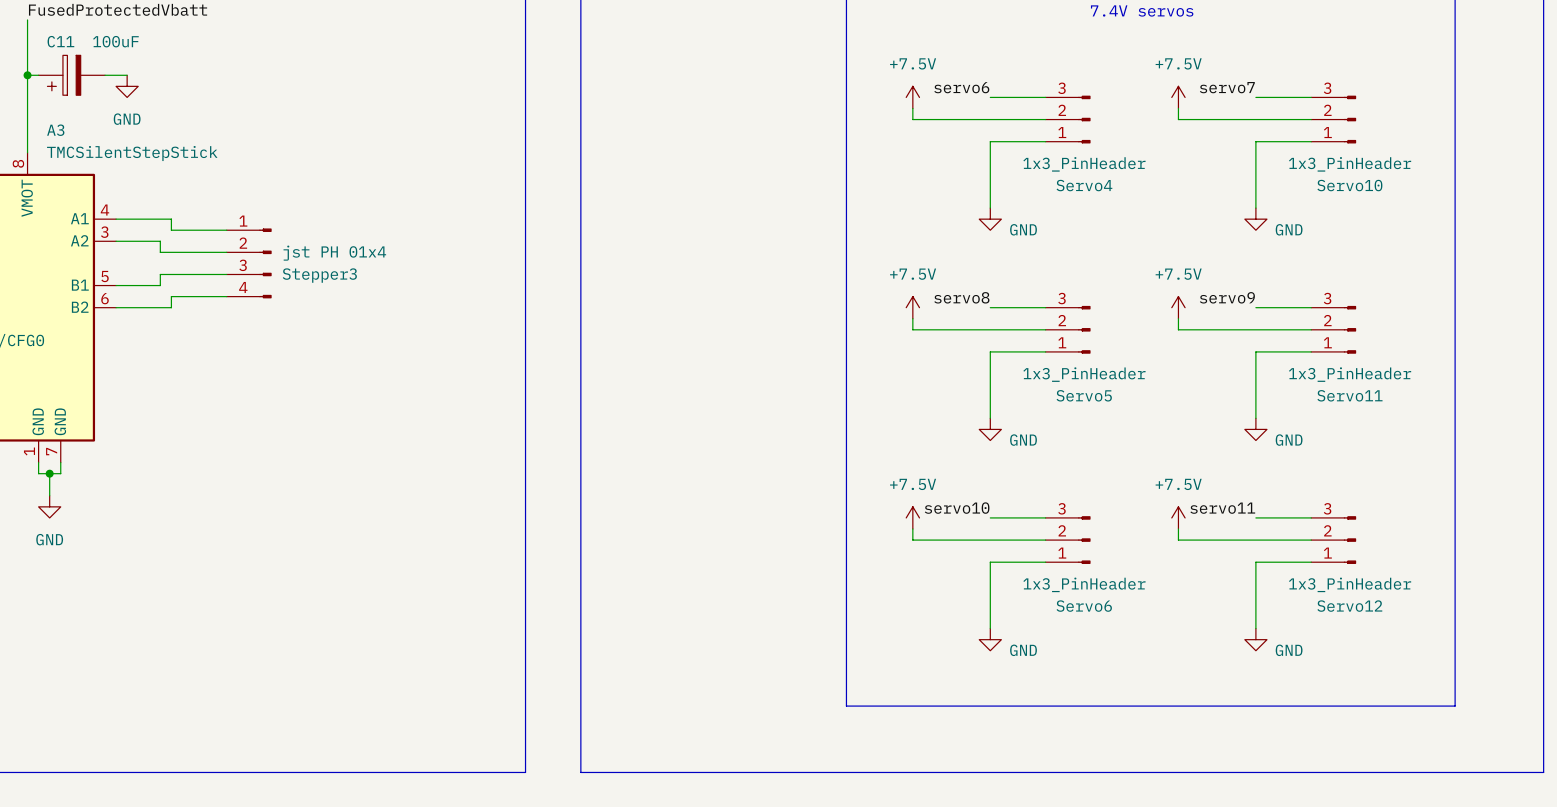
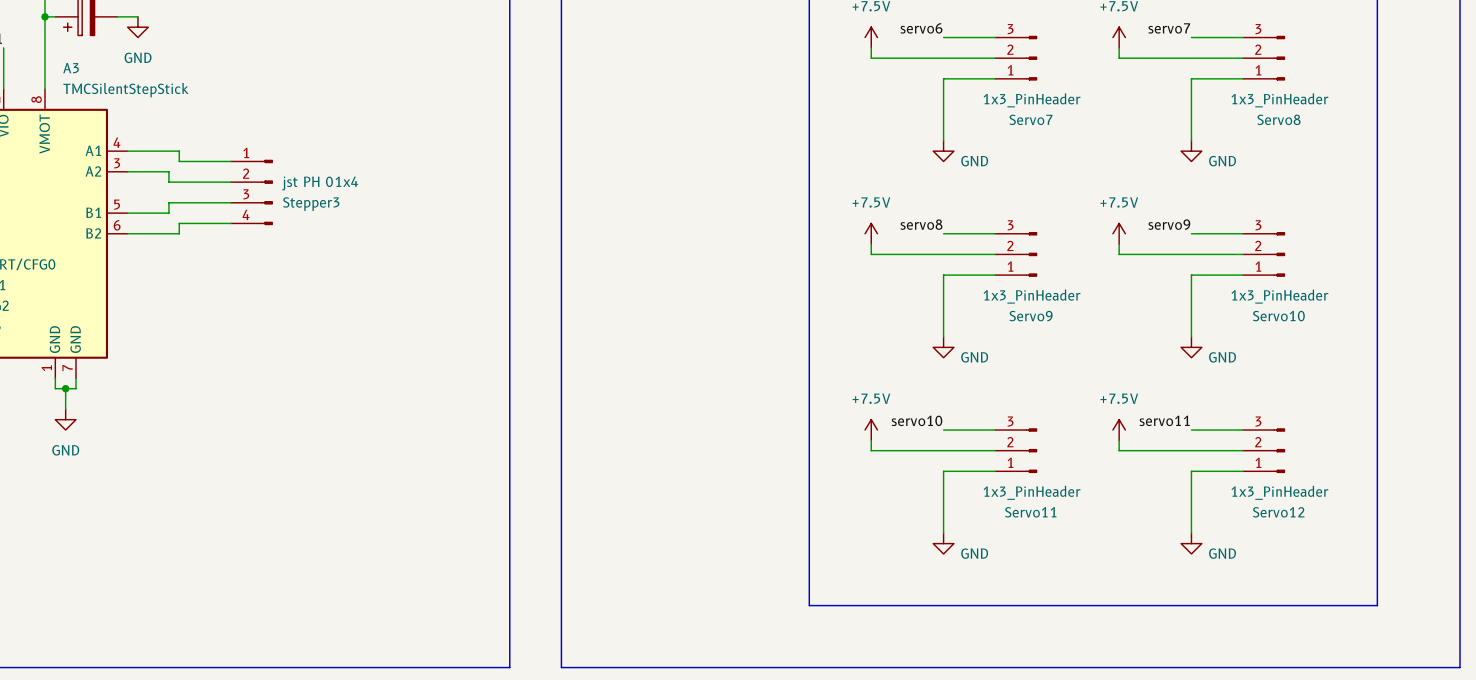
Servo4 name: Servo4 (1084, 185) -> Servo7 (1030, 119)
Servo10 name: Servo10 (1349, 185) -> Servo8 (1278, 119)
Servo5 name: Servo5 (1084, 395) -> Servo9 (1031, 316)
Servo11 name: Servo11 (1349, 395) -> Servo10 (1278, 316)
Servo6 name: Servo6 (1084, 606) -> Servo11 (1030, 512)

